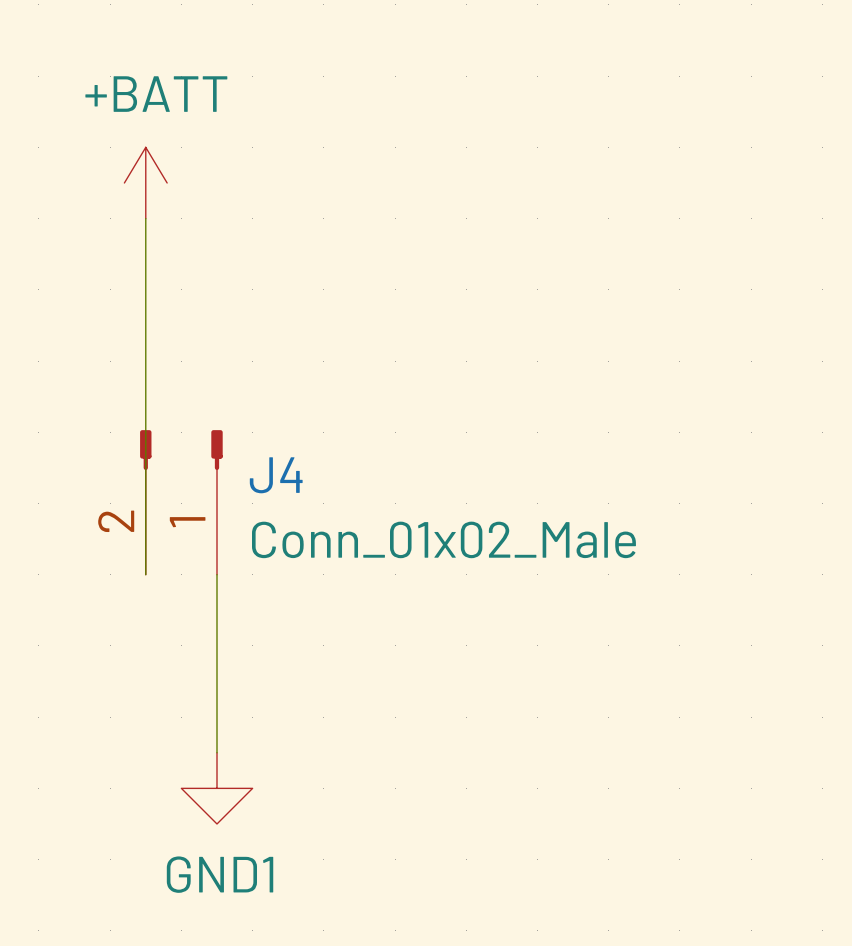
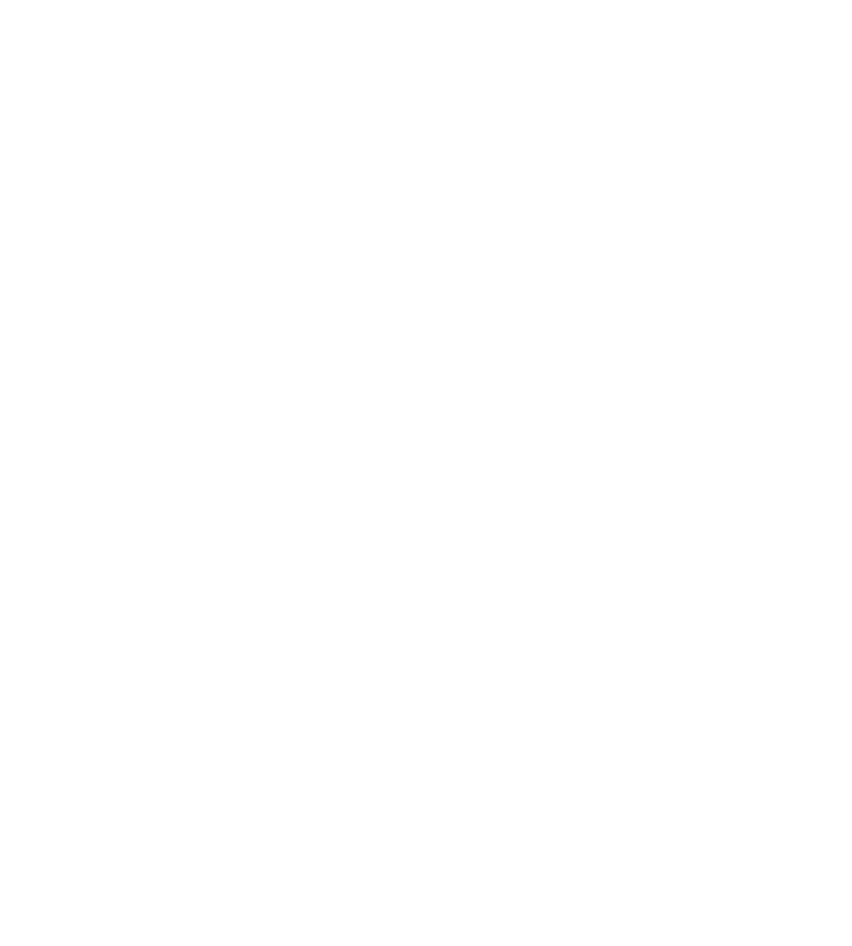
power symbol: +BATT (145, 182) -> none
wire: (145, 218) (145, 574) -> none
J4: Conn_01x02_Male (181, 502) -> none
wire: (217, 574) (217, 752) -> none
power symbol: GND1 (217, 788) -> none

